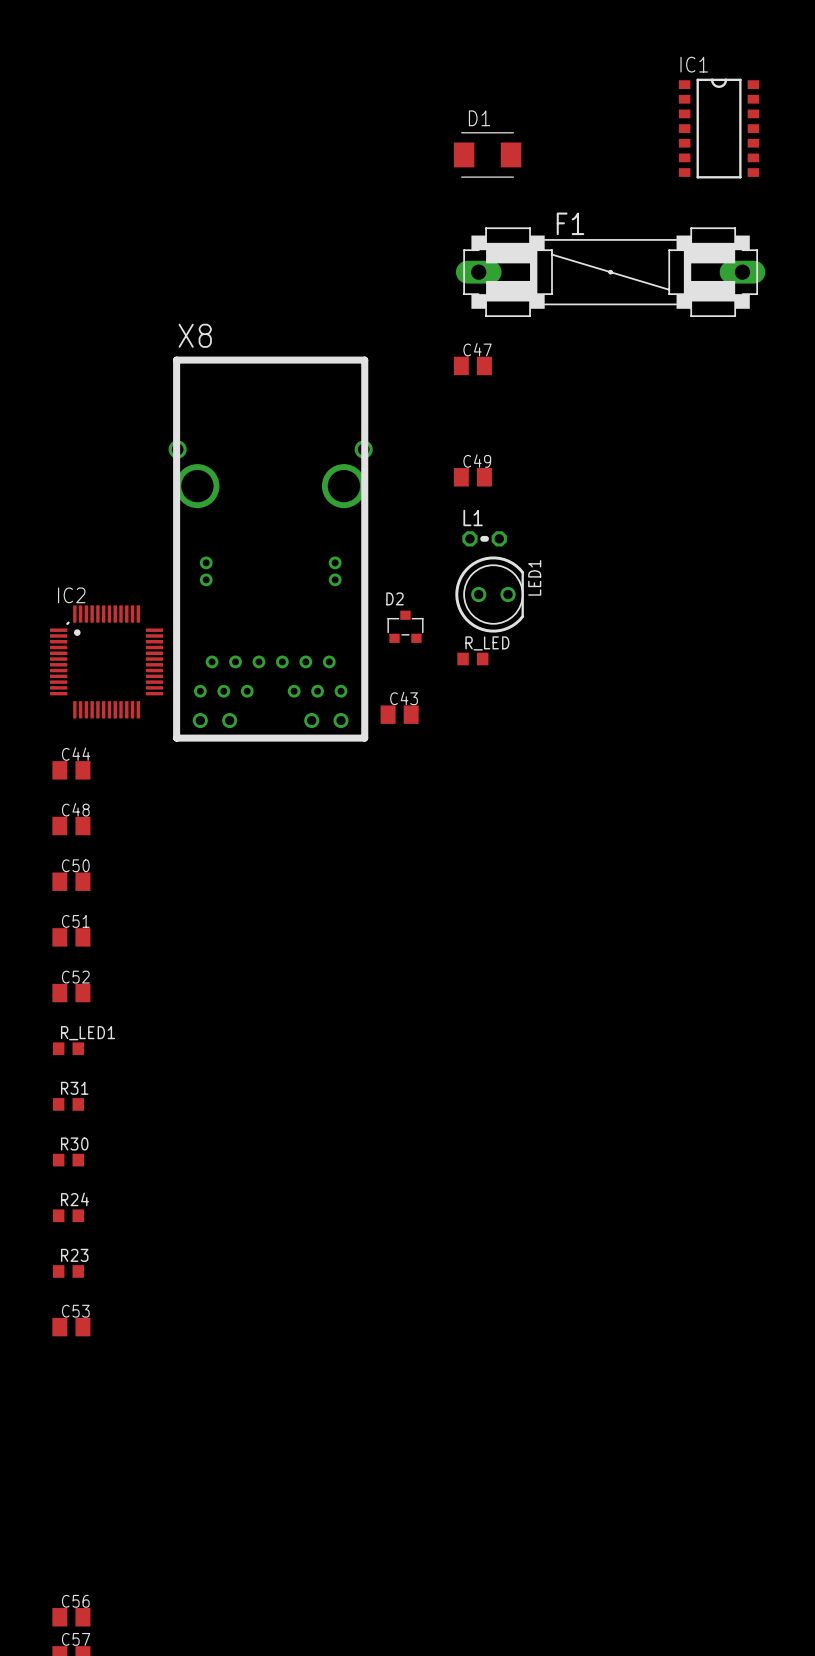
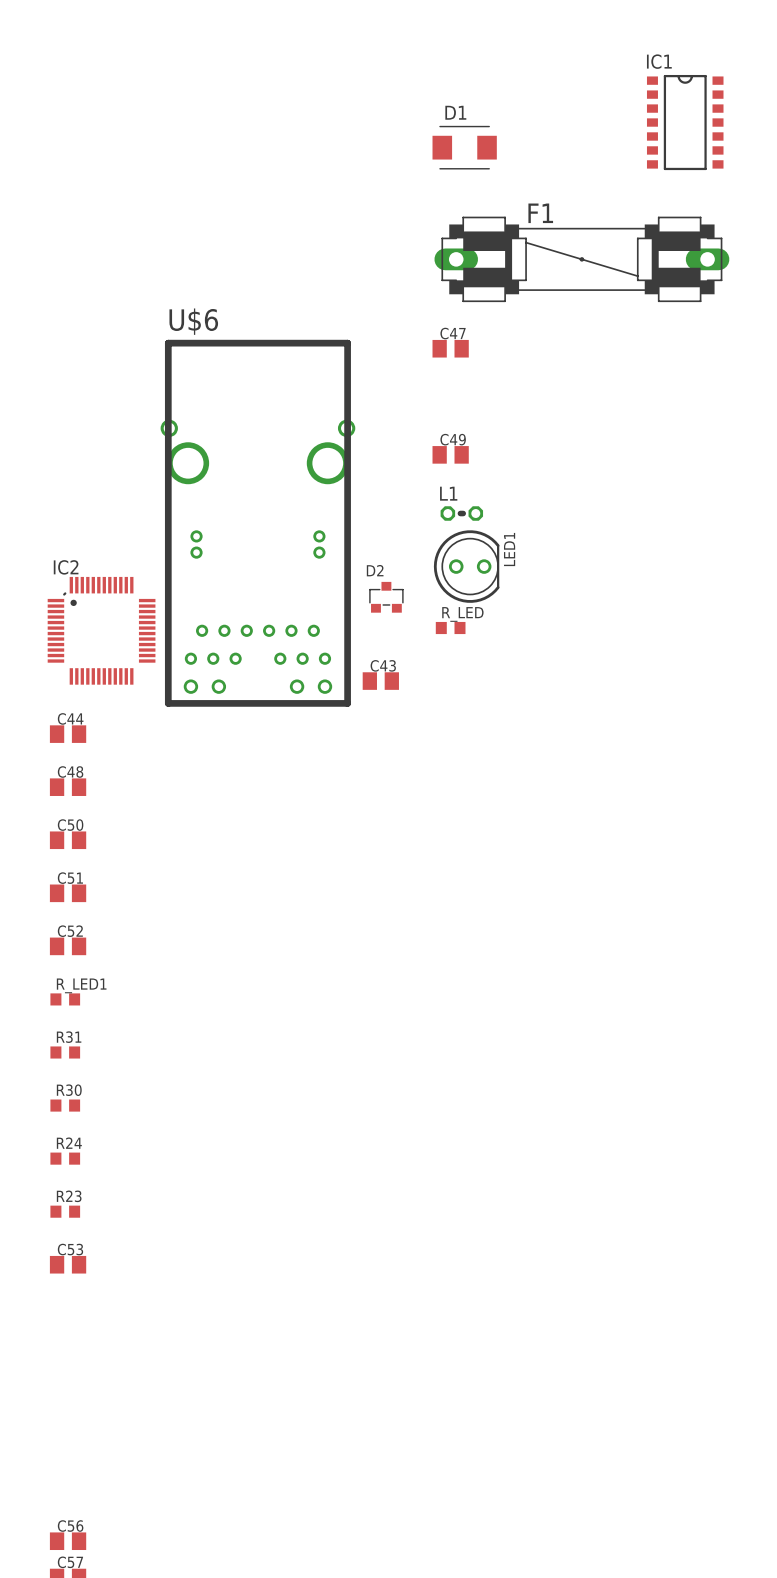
X8 name: X8 (195, 335) -> U$6 (193, 321)

